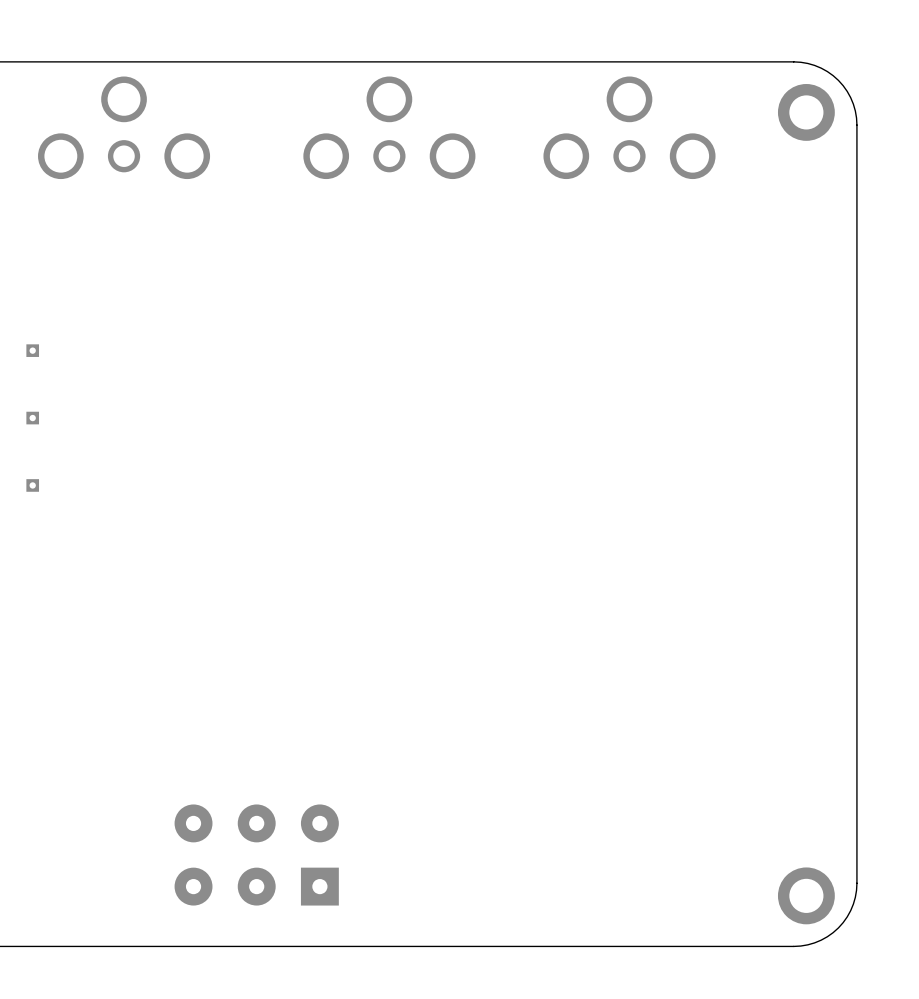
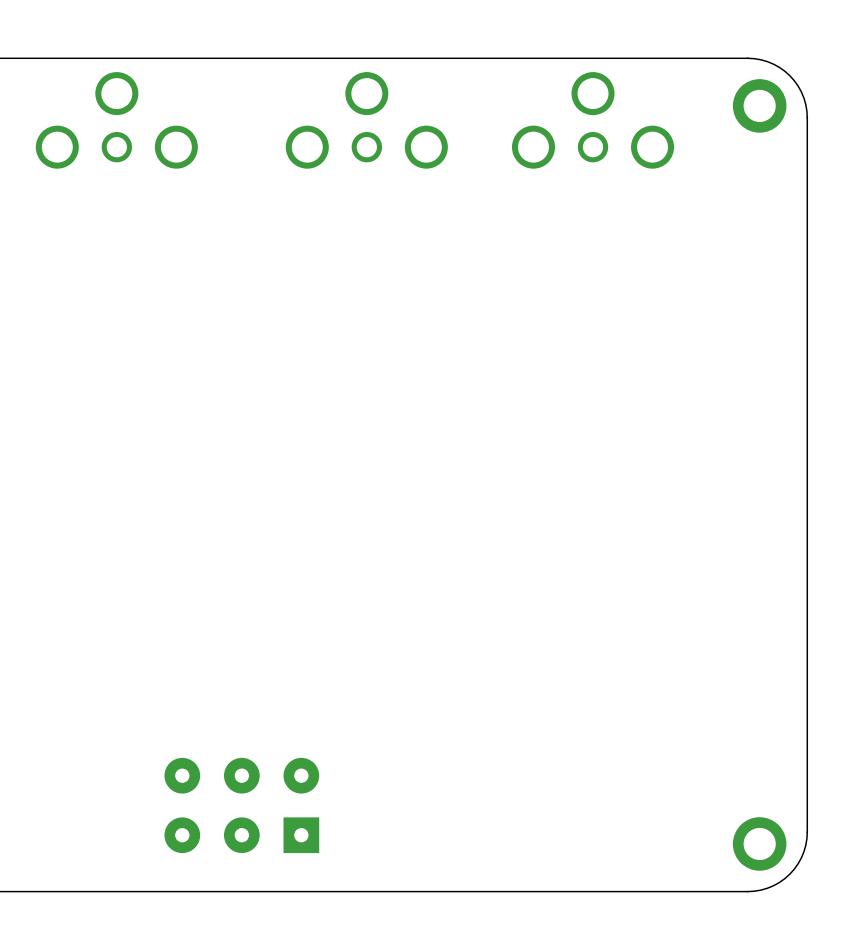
part: (32, 350) -> none
part: (32, 418) -> none
part: (32, 485) -> none

